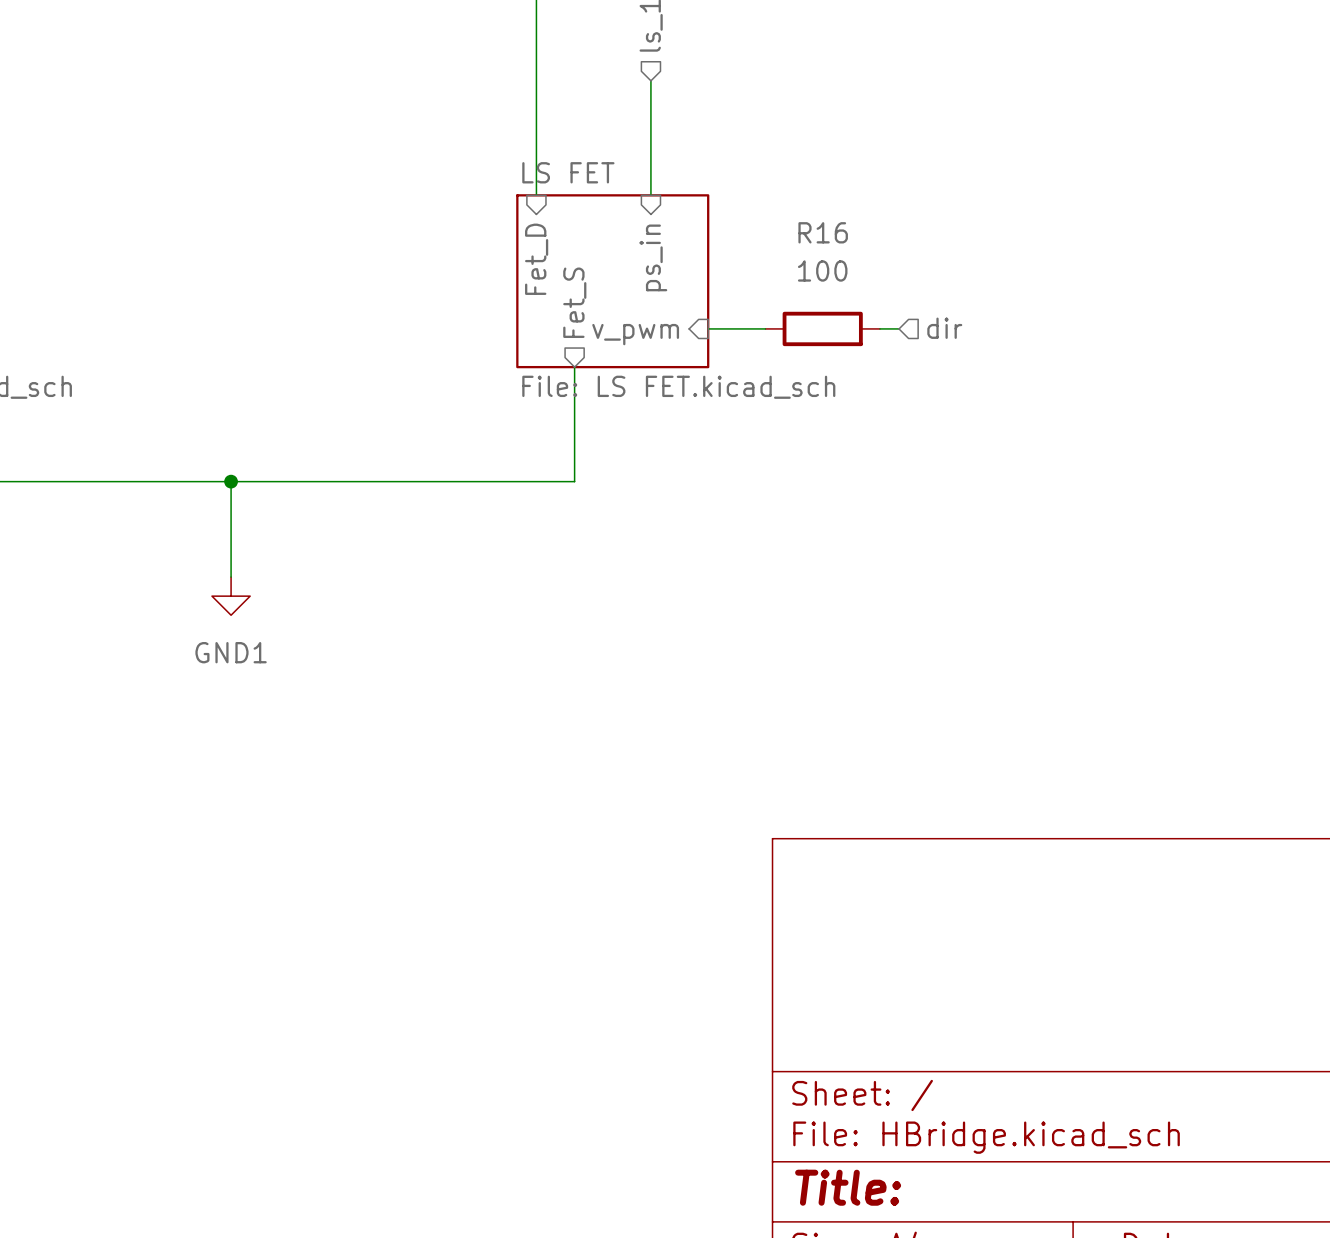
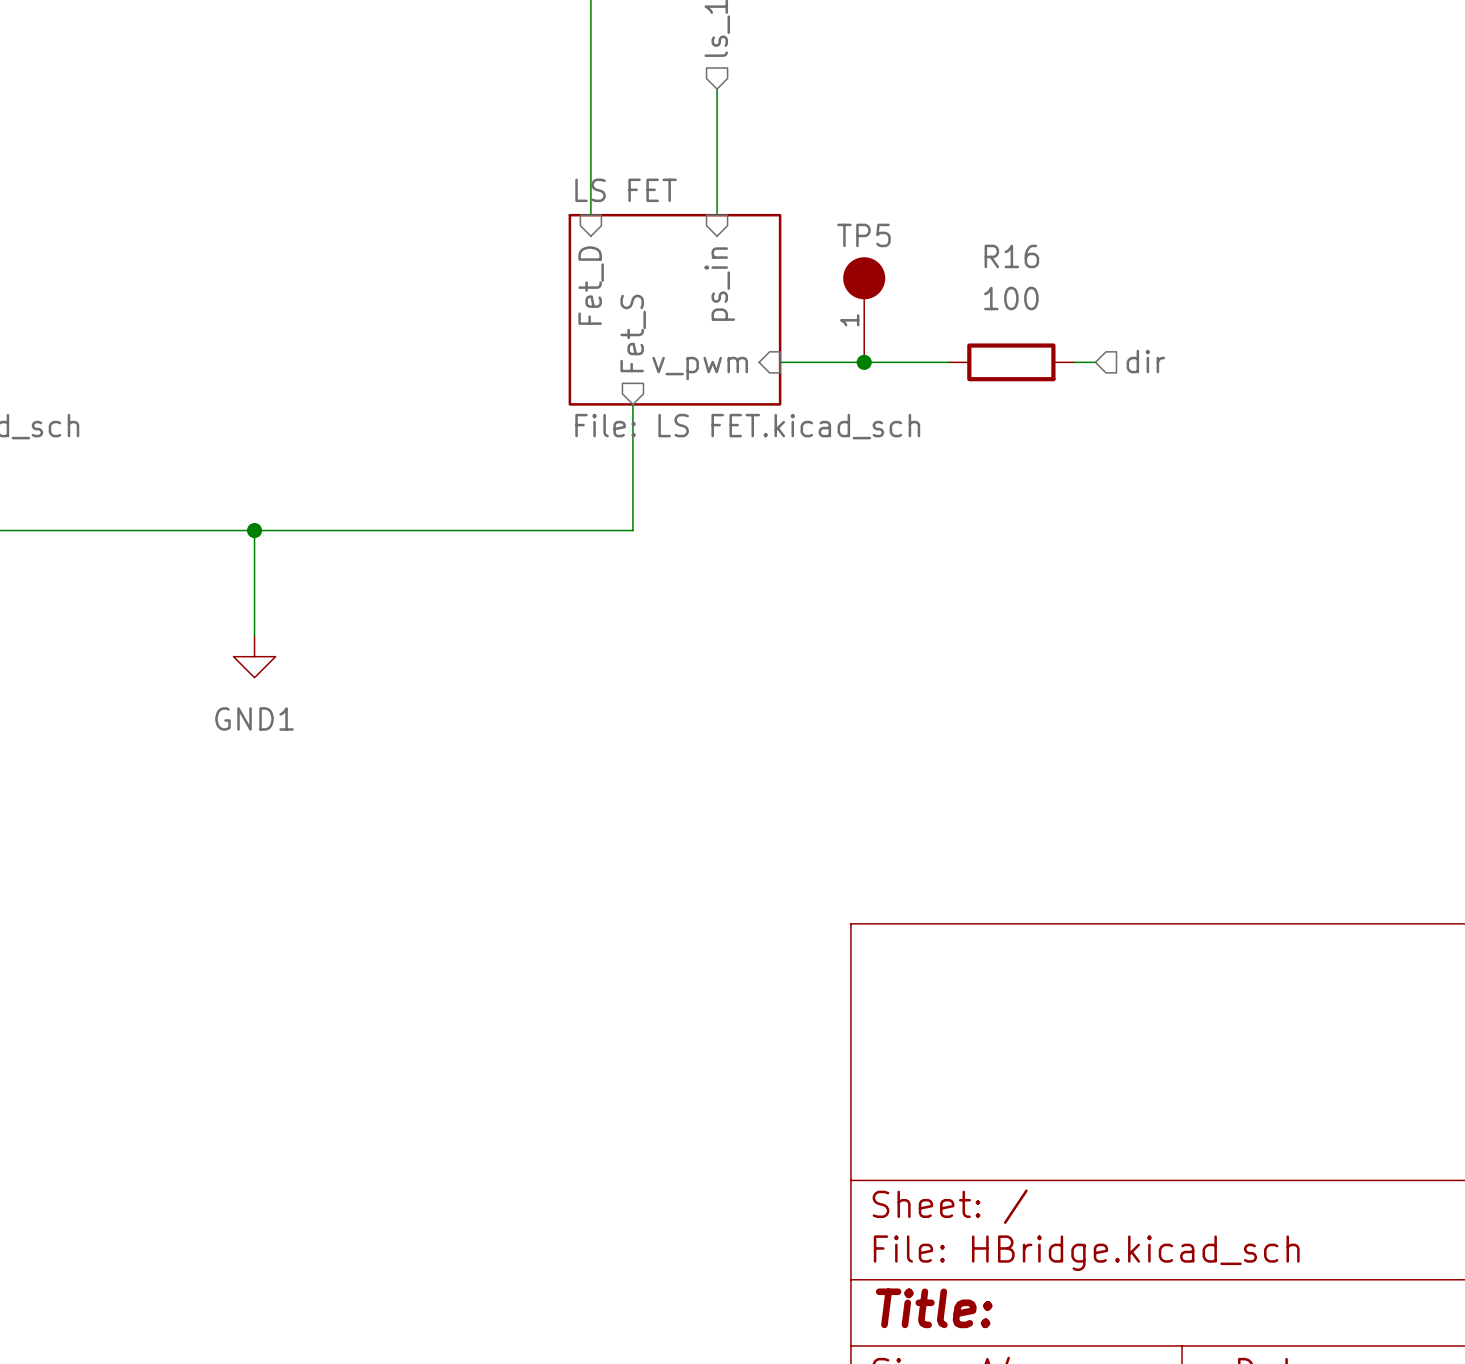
TP5: none -> (864, 309)
wire: none -> (843, 362) (948, 362)
junction: none -> (864, 362)
R16 position: (822, 328) -> (1011, 362)
wire: (879, 328) (899, 328) -> (1074, 362) (1095, 362)
hierarchical label position: dir (944, 328) -> dir (1145, 361)

